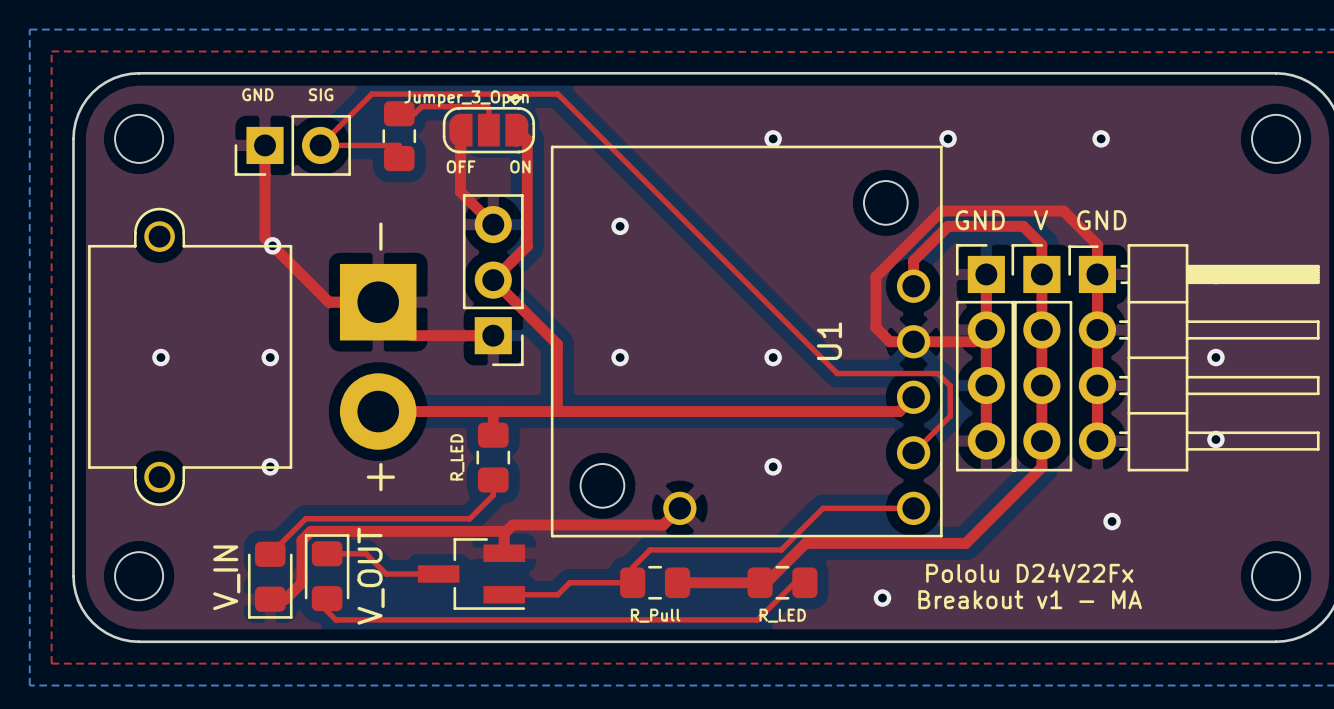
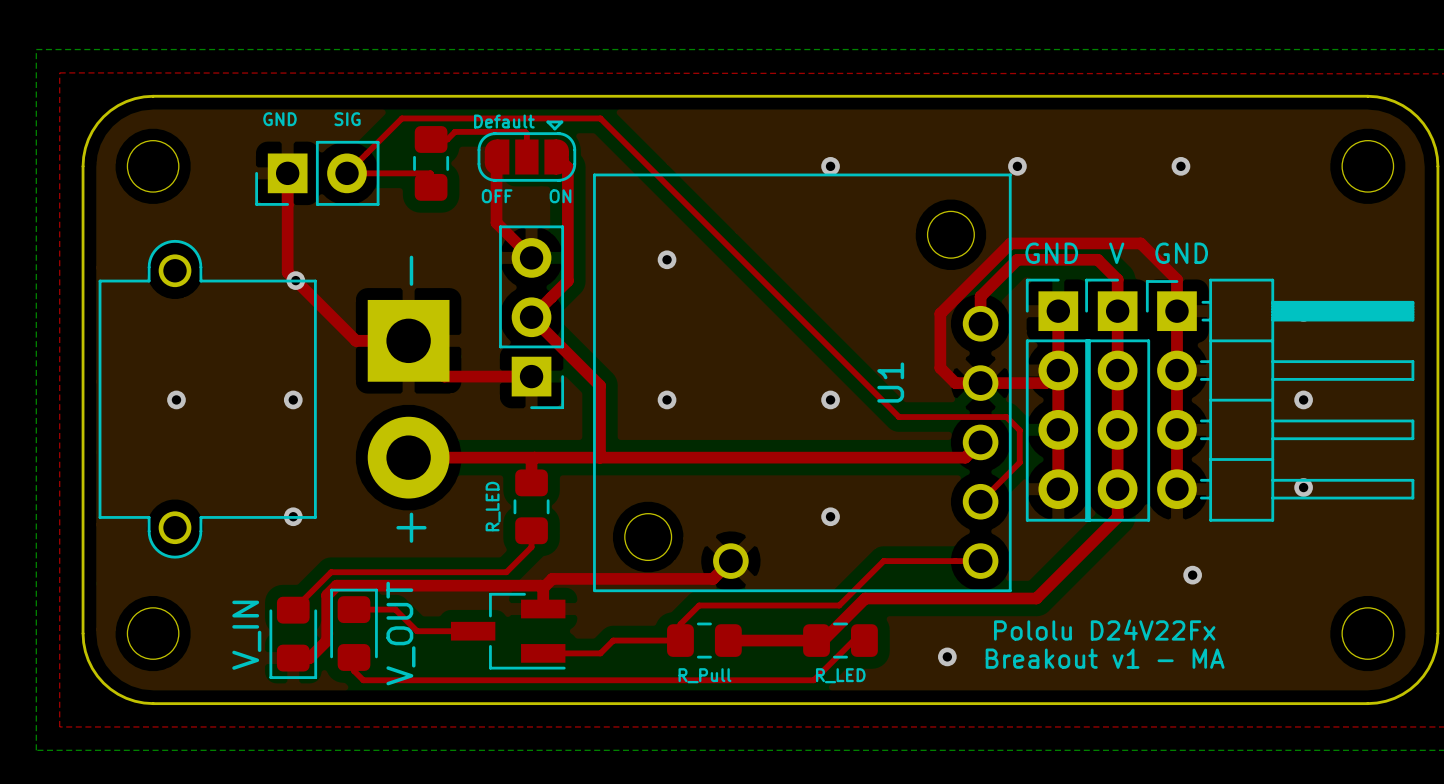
part value: Jumper_3_Open (466, 98) -> Default (504, 121)

